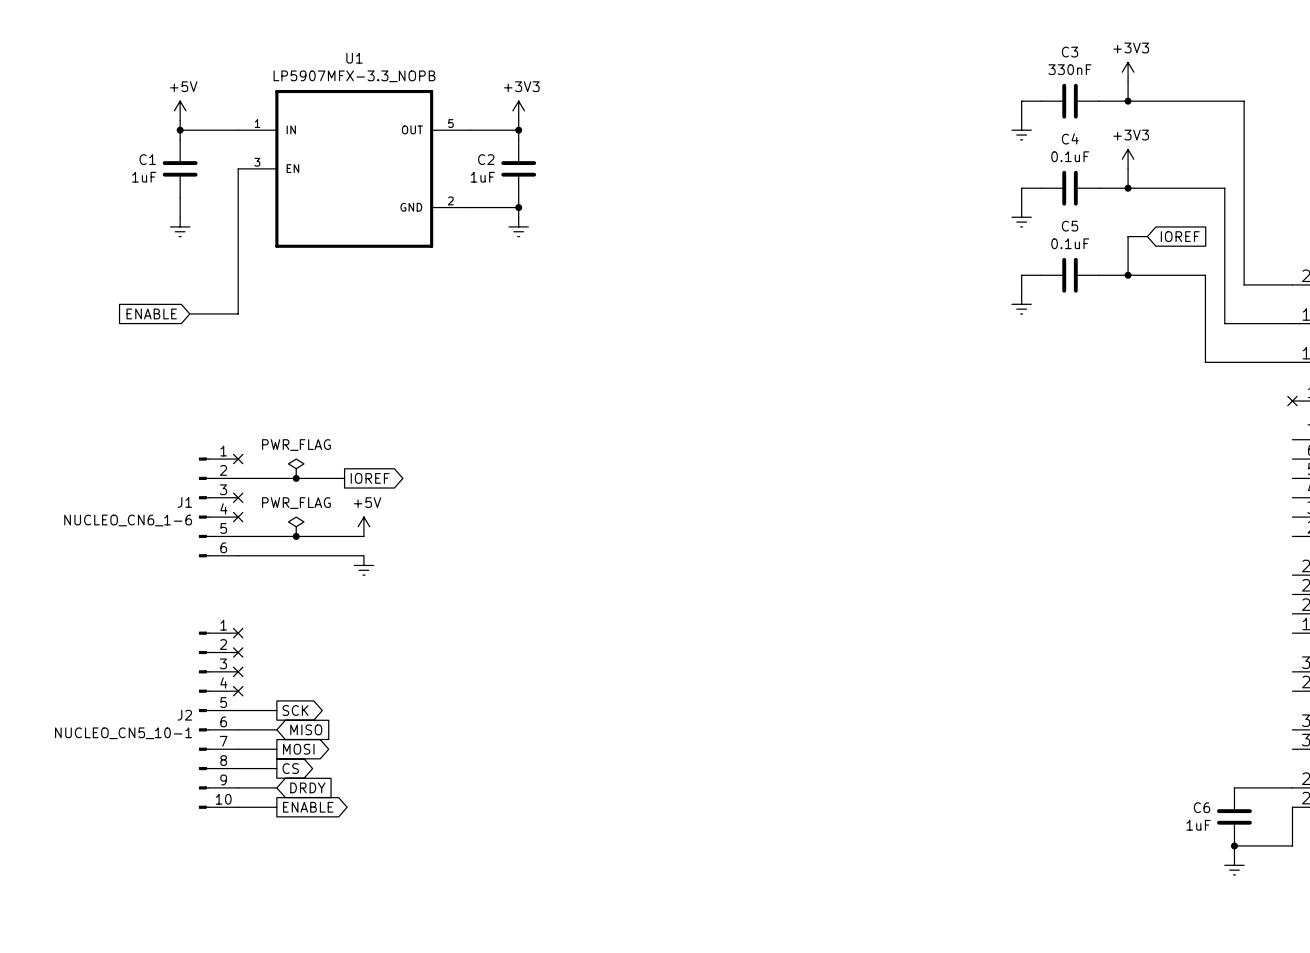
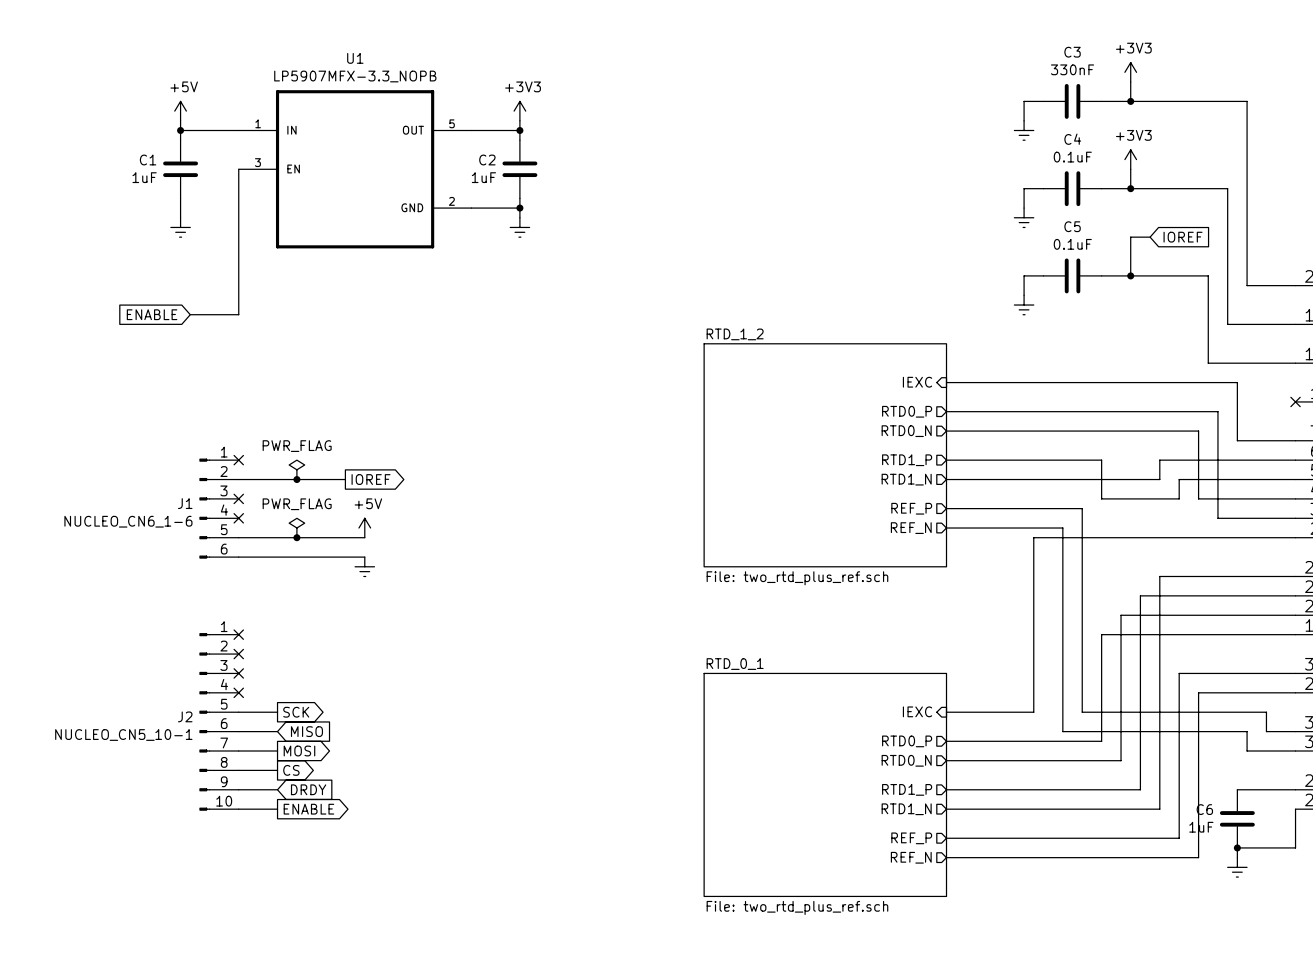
sheet pin: none -> IEXC (917, 382)
wire: none -> (946, 382) (1237, 382) (1237, 440) (1295, 440)
sheet pin: none -> RTD0_P (907, 411)
wire: none -> (946, 411) (1217, 411) (1217, 518) (1295, 518)
sheet pin: none -> RTD0_N (906, 431)
wire: none -> (946, 431) (1198, 431) (1198, 498) (1295, 498)
sheet RTD_1_2: none -> File: two_rtd_plus_ref.sch (825, 455)
sheet pin: none -> RTD1_P (907, 460)
wire: none -> (946, 460) (1101, 460) (1101, 498) (1179, 498) (1179, 479) (1295, 479)
wire: none -> (1295, 460) (1159, 460) (1159, 479) (946, 479)
sheet pin: none -> RTD1_N (906, 479)
sheet pin: none -> REF_P (911, 508)
wire: none -> (946, 508) (1082, 508) (1082, 712) (1266, 712) (1266, 731) (1295, 731)
sheet pin: none -> REF_N (911, 528)
wire: none -> (946, 528) (1062, 528) (1062, 731) (1247, 731) (1247, 751) (1295, 751)
wire: none -> (1295, 537) (1033, 537) (1033, 712) (946, 712)
wire: none -> (1295, 576) (1159, 576) (1159, 809) (946, 809)
wire: none -> (1295, 595) (1140, 595) (1140, 789) (946, 789)
wire: none -> (1295, 615) (1121, 615) (1121, 760) (946, 760)
wire: none -> (1295, 634) (1101, 634) (1101, 741) (946, 741)
wire: none -> (1295, 673) (1179, 673) (1179, 838) (946, 838)
wire: none -> (1295, 692) (1198, 692) (1198, 857) (946, 857)
sheet pin: none -> IEXC (917, 711)
sheet pin: none -> RTD0_P (907, 741)
sheet pin: none -> RTD0_N (906, 760)
sheet RTD_0_1: none -> File: two_rtd_plus_ref.sch (825, 784)
sheet pin: none -> RTD1_P (907, 789)
sheet pin: none -> RTD1_N (906, 809)
sheet pin: none -> REF_P (911, 838)
sheet pin: none -> REF_N (911, 857)

